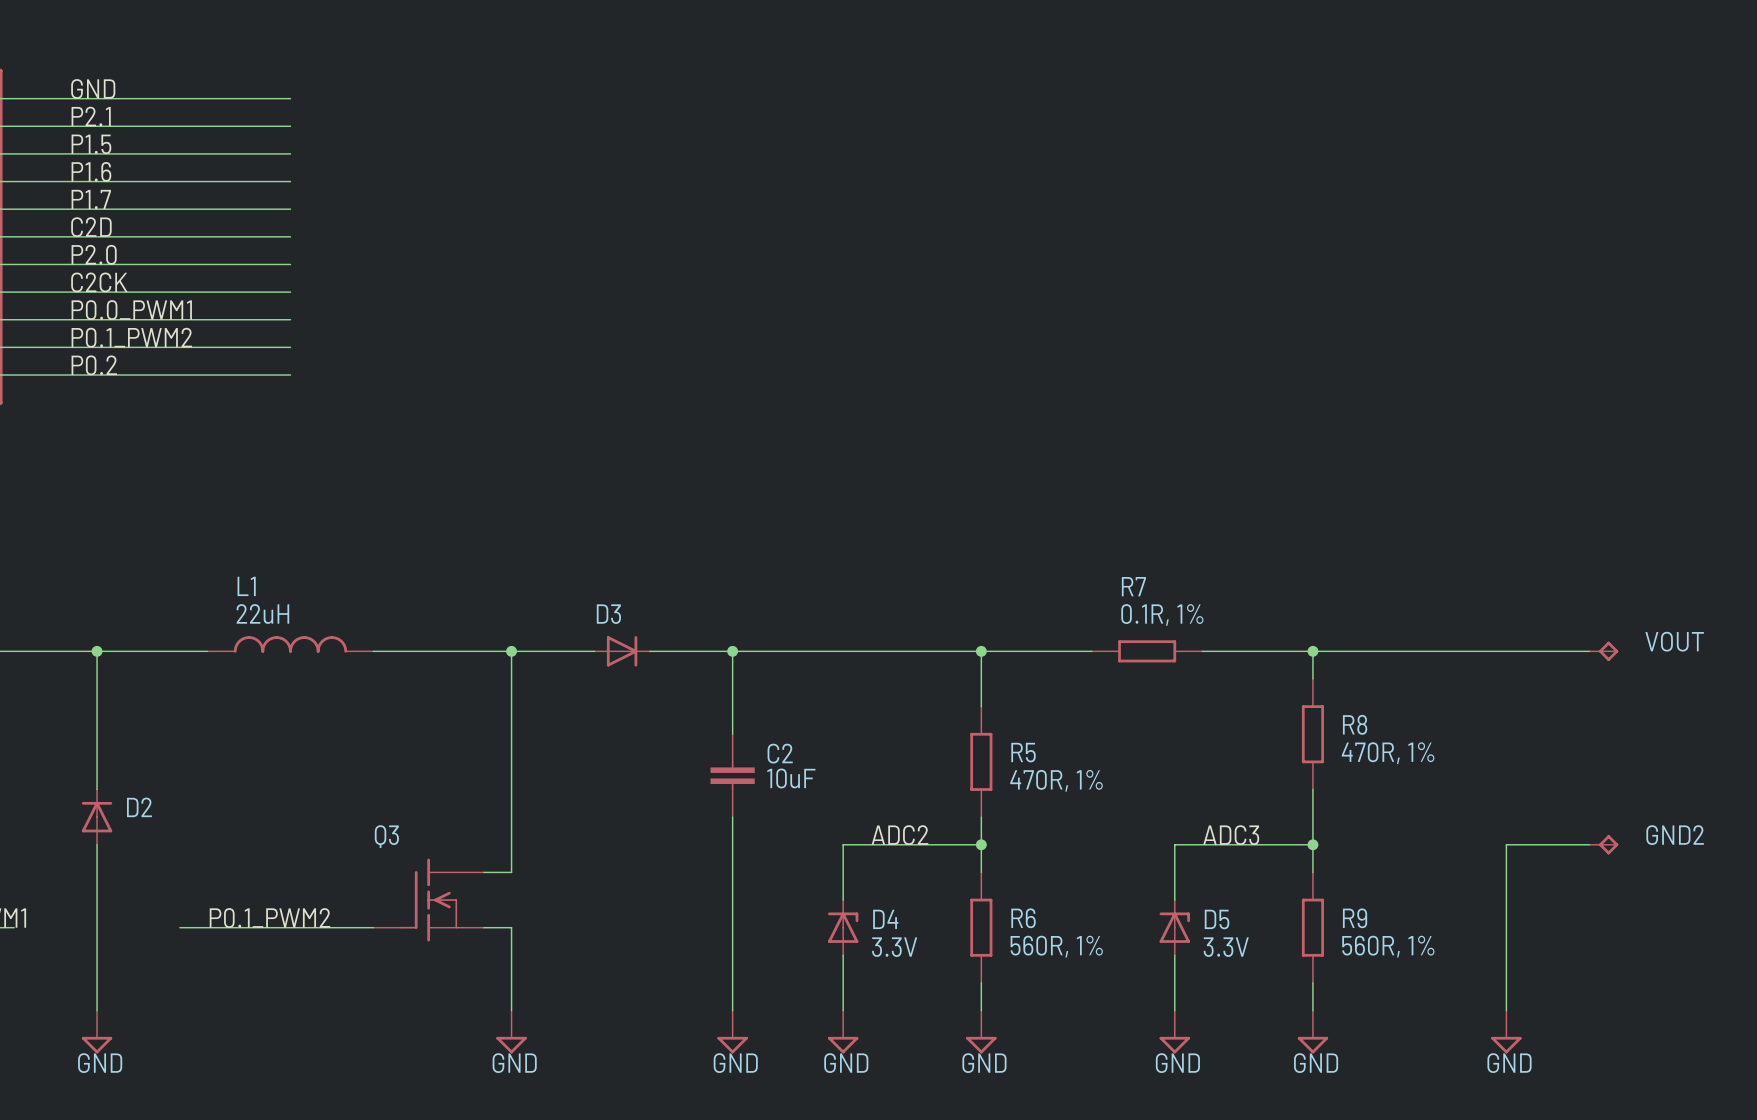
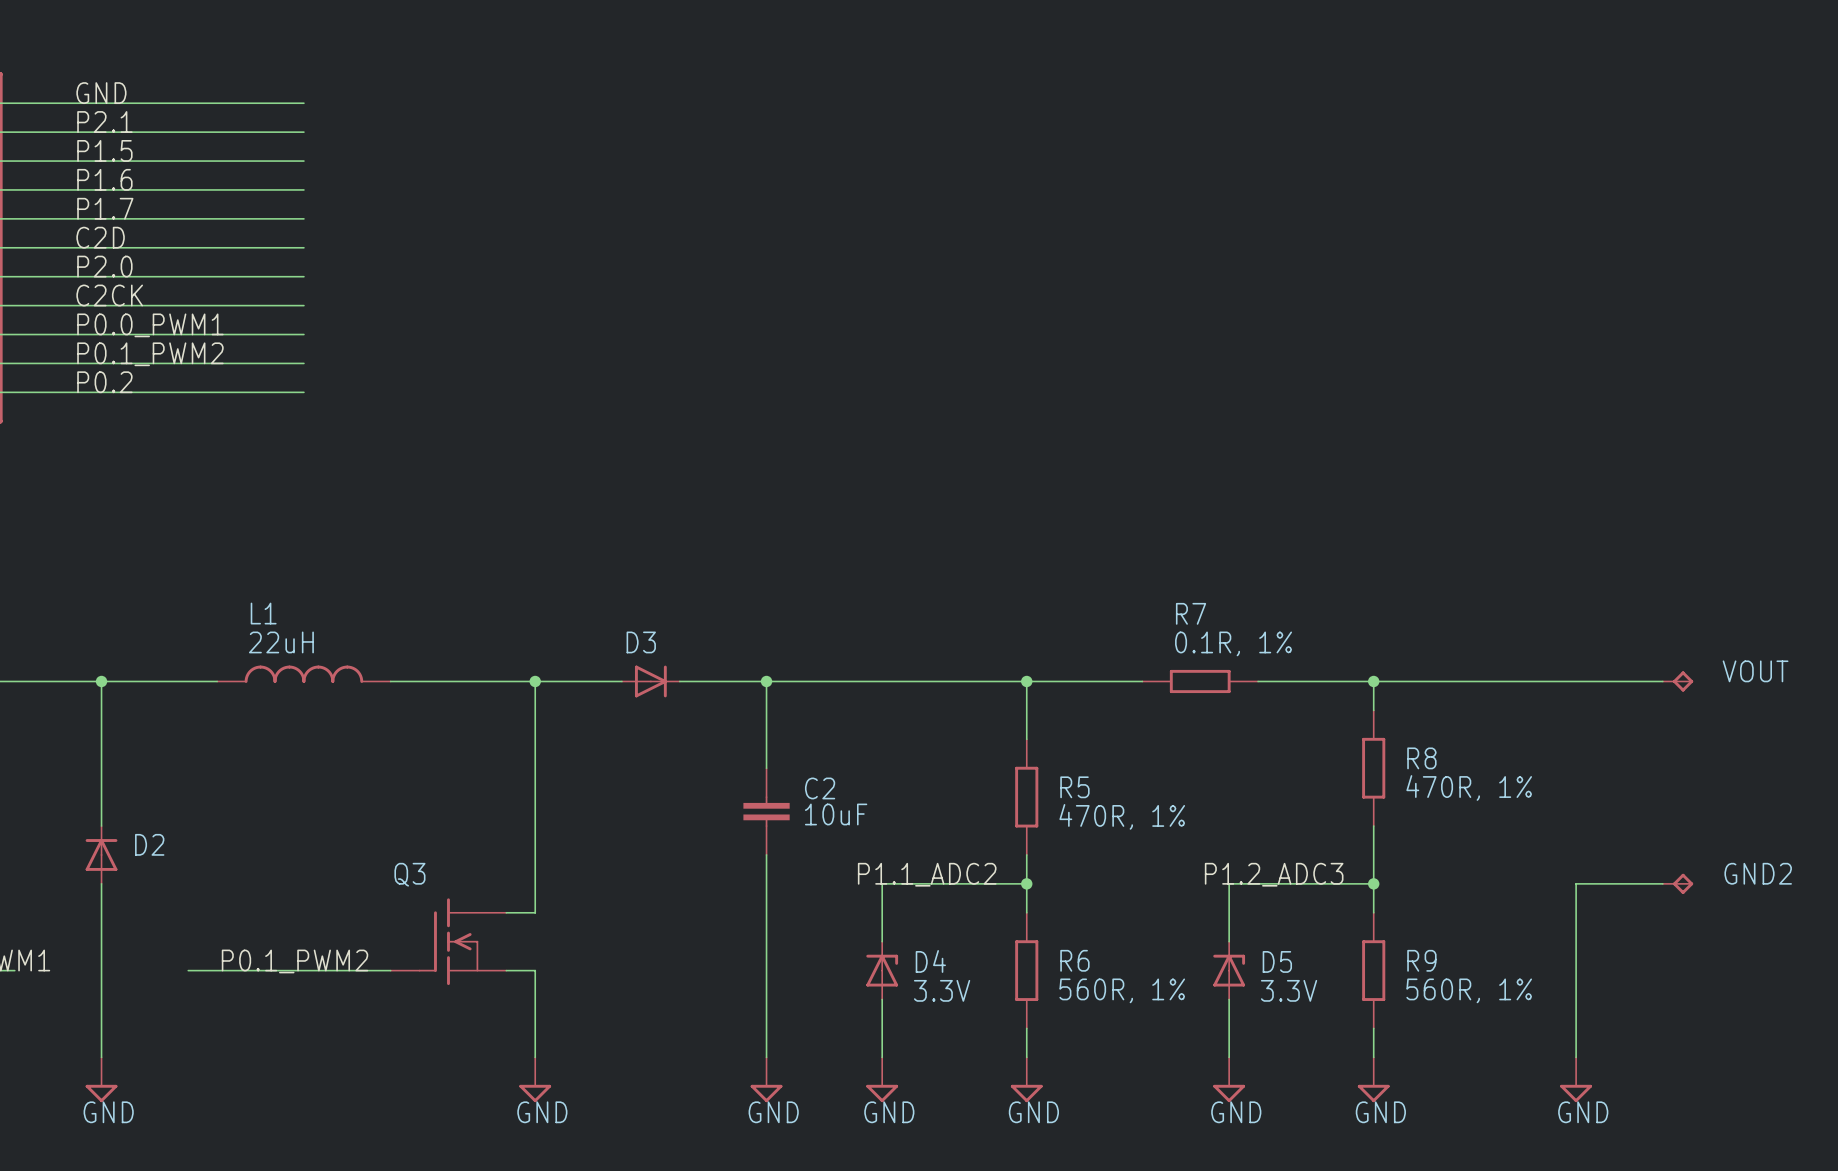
label: ADC2 (899, 835) -> P1.1_ADC2 (927, 874)
label: ADC3 (1231, 835) -> P1.2_ADC3 (1274, 874)

